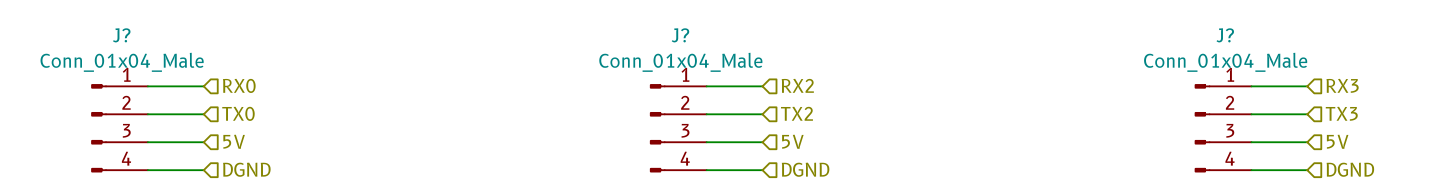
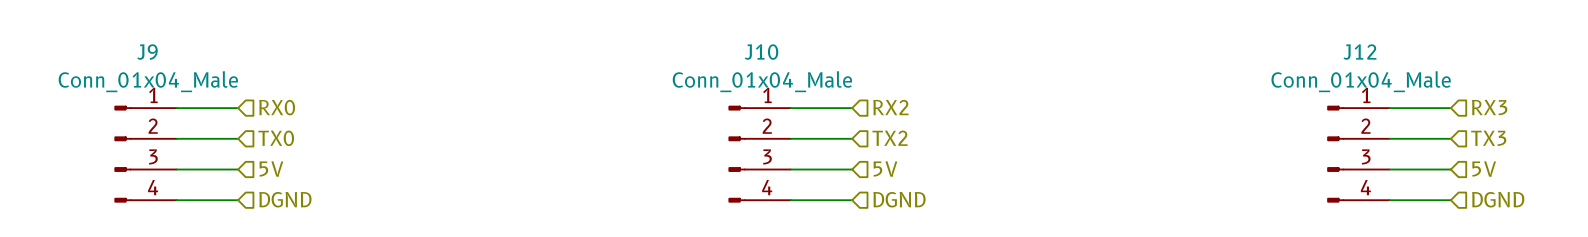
J? name: J? (121, 35) -> J9 (147, 52)
J? name: J? (680, 35) -> J10 (761, 52)
J? name: J? (1225, 35) -> J12 (1359, 52)

